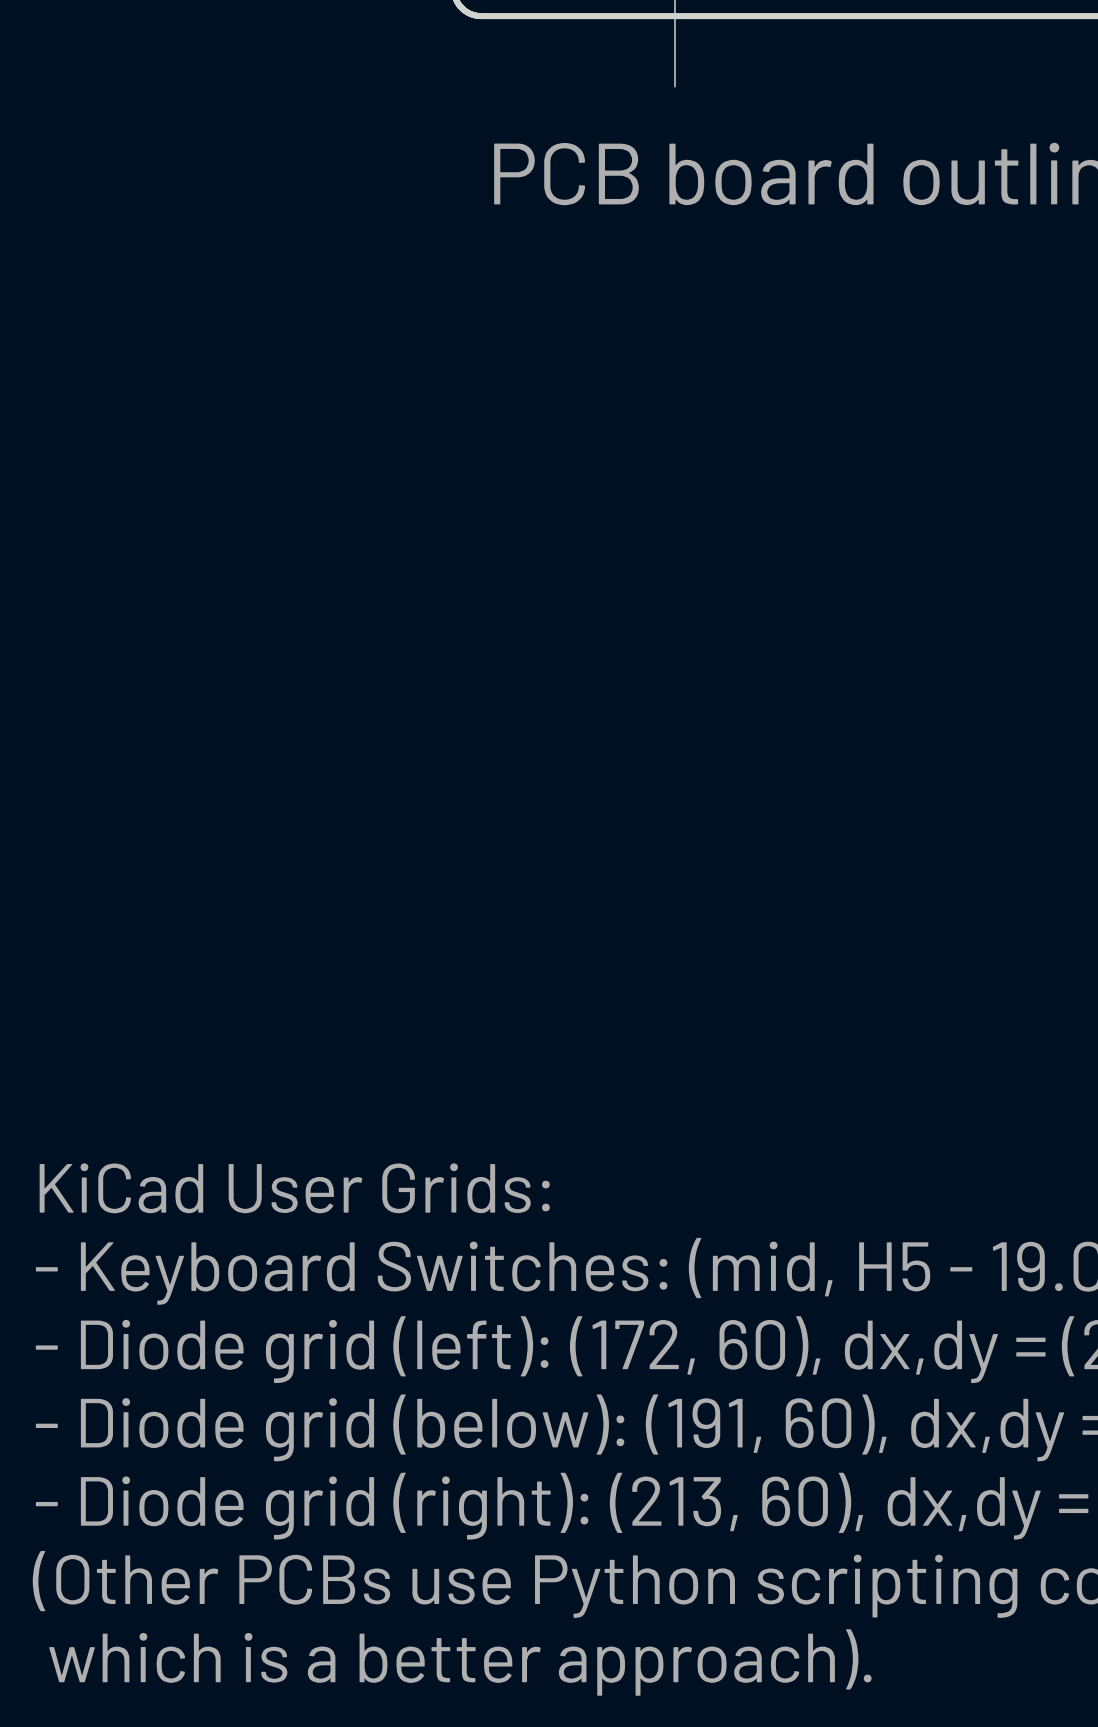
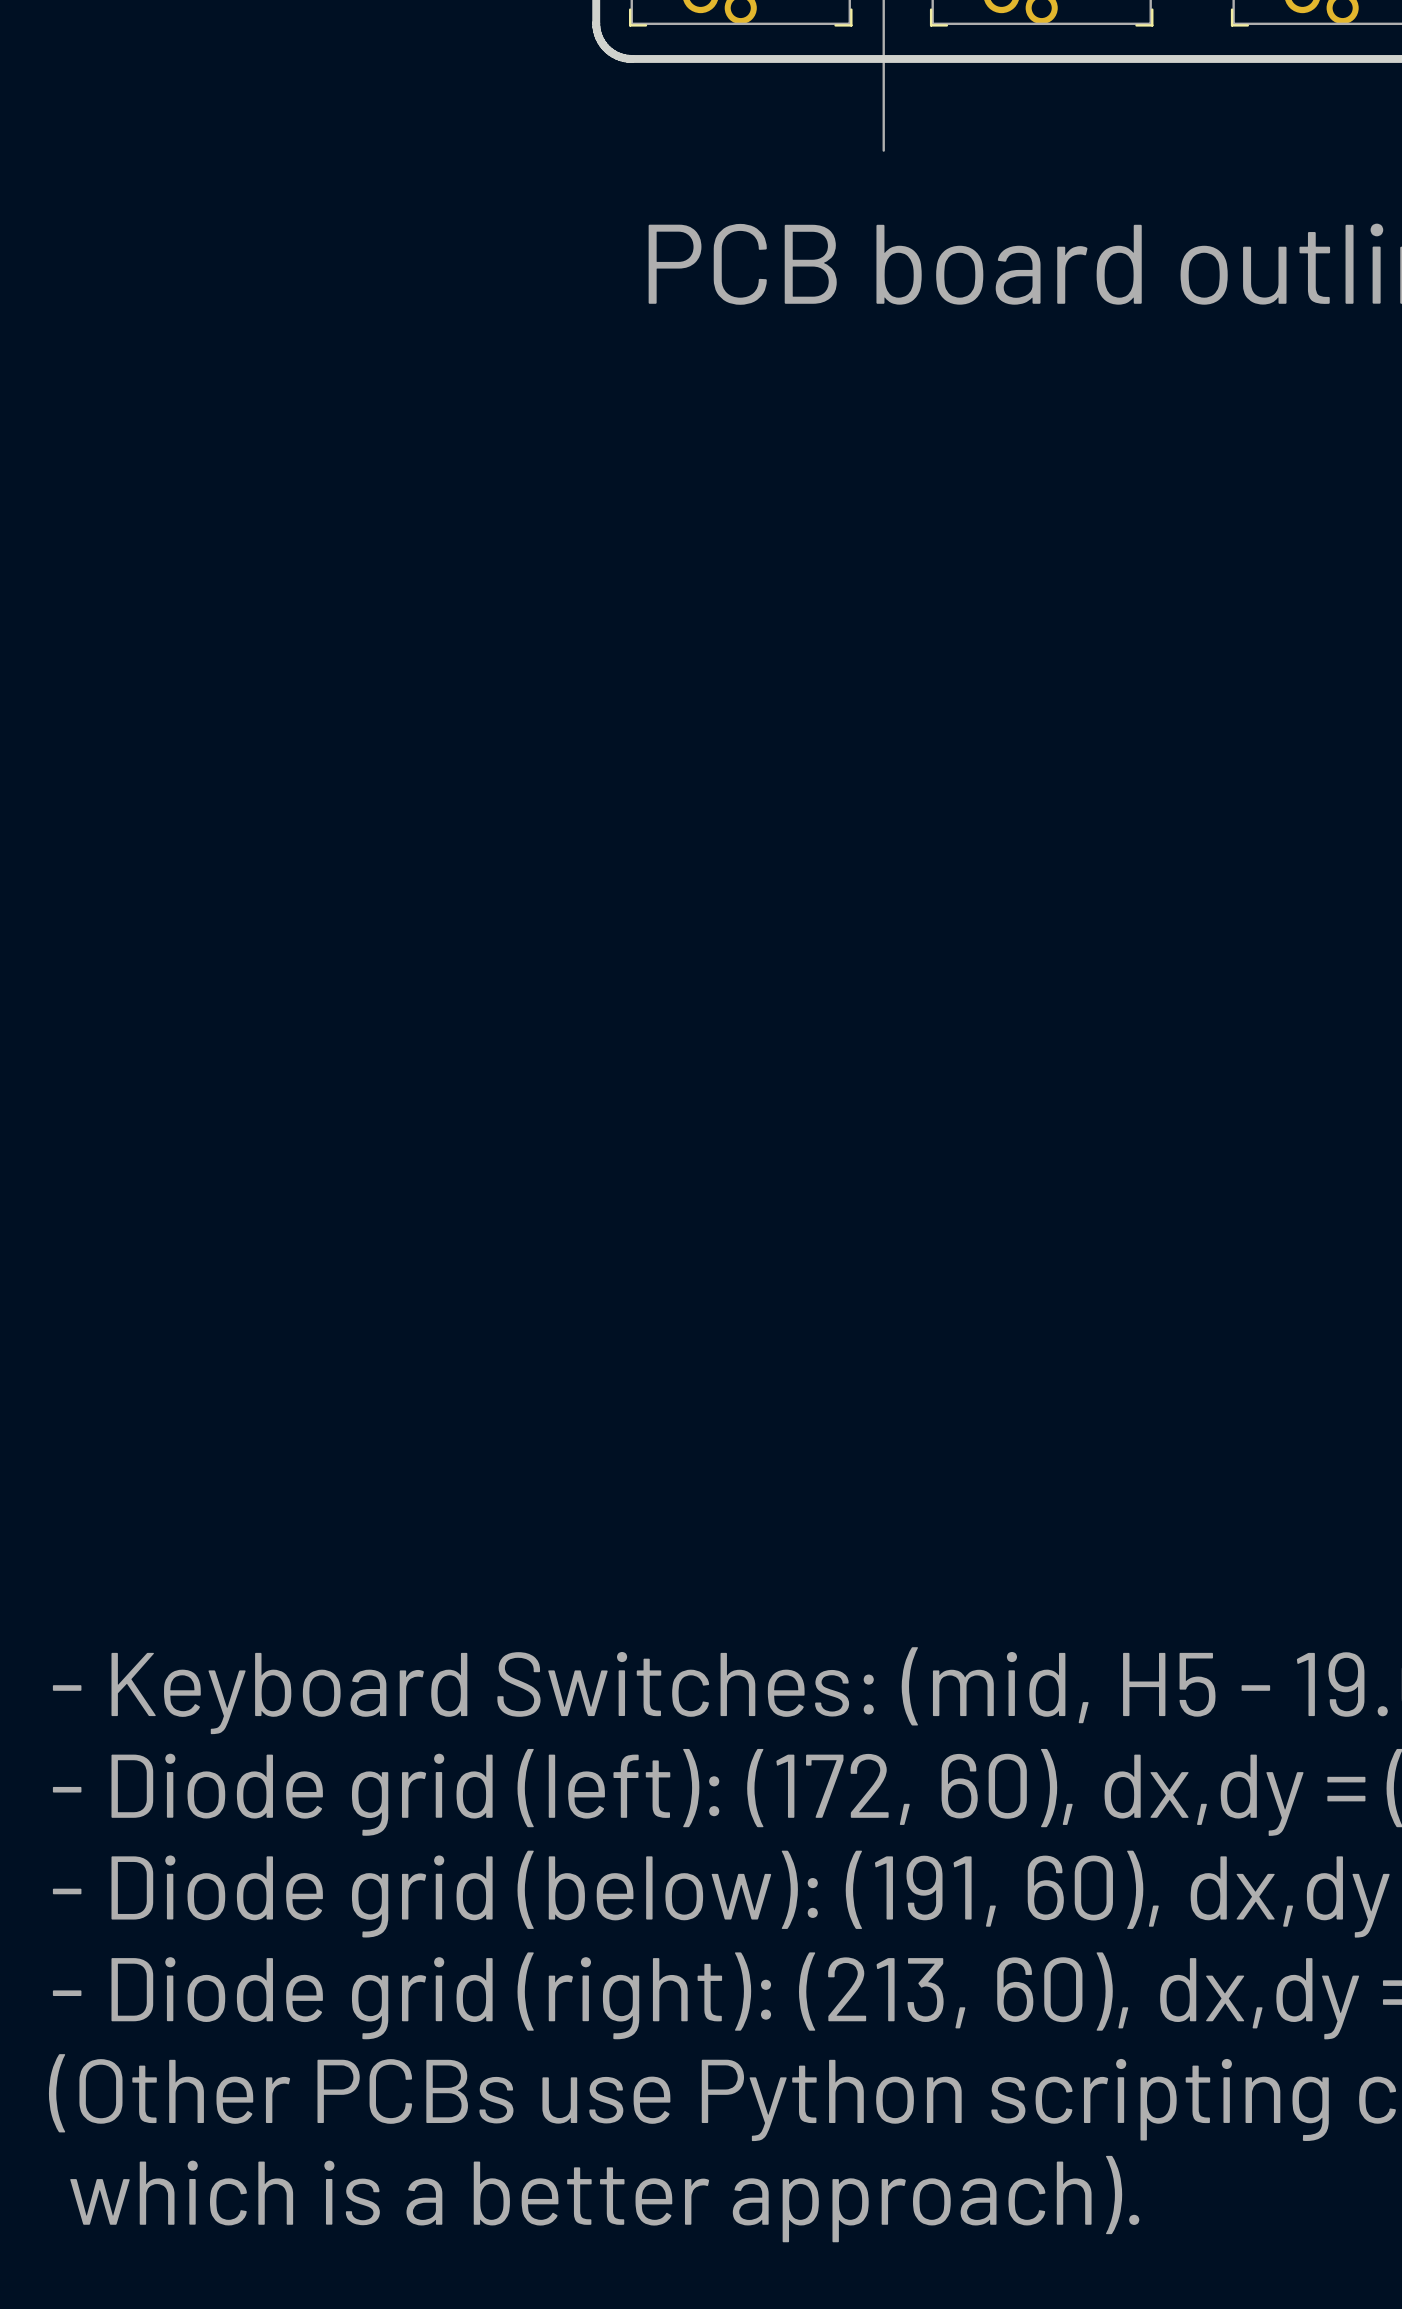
text: KiCad User Grids: (294, 1188) -> none

